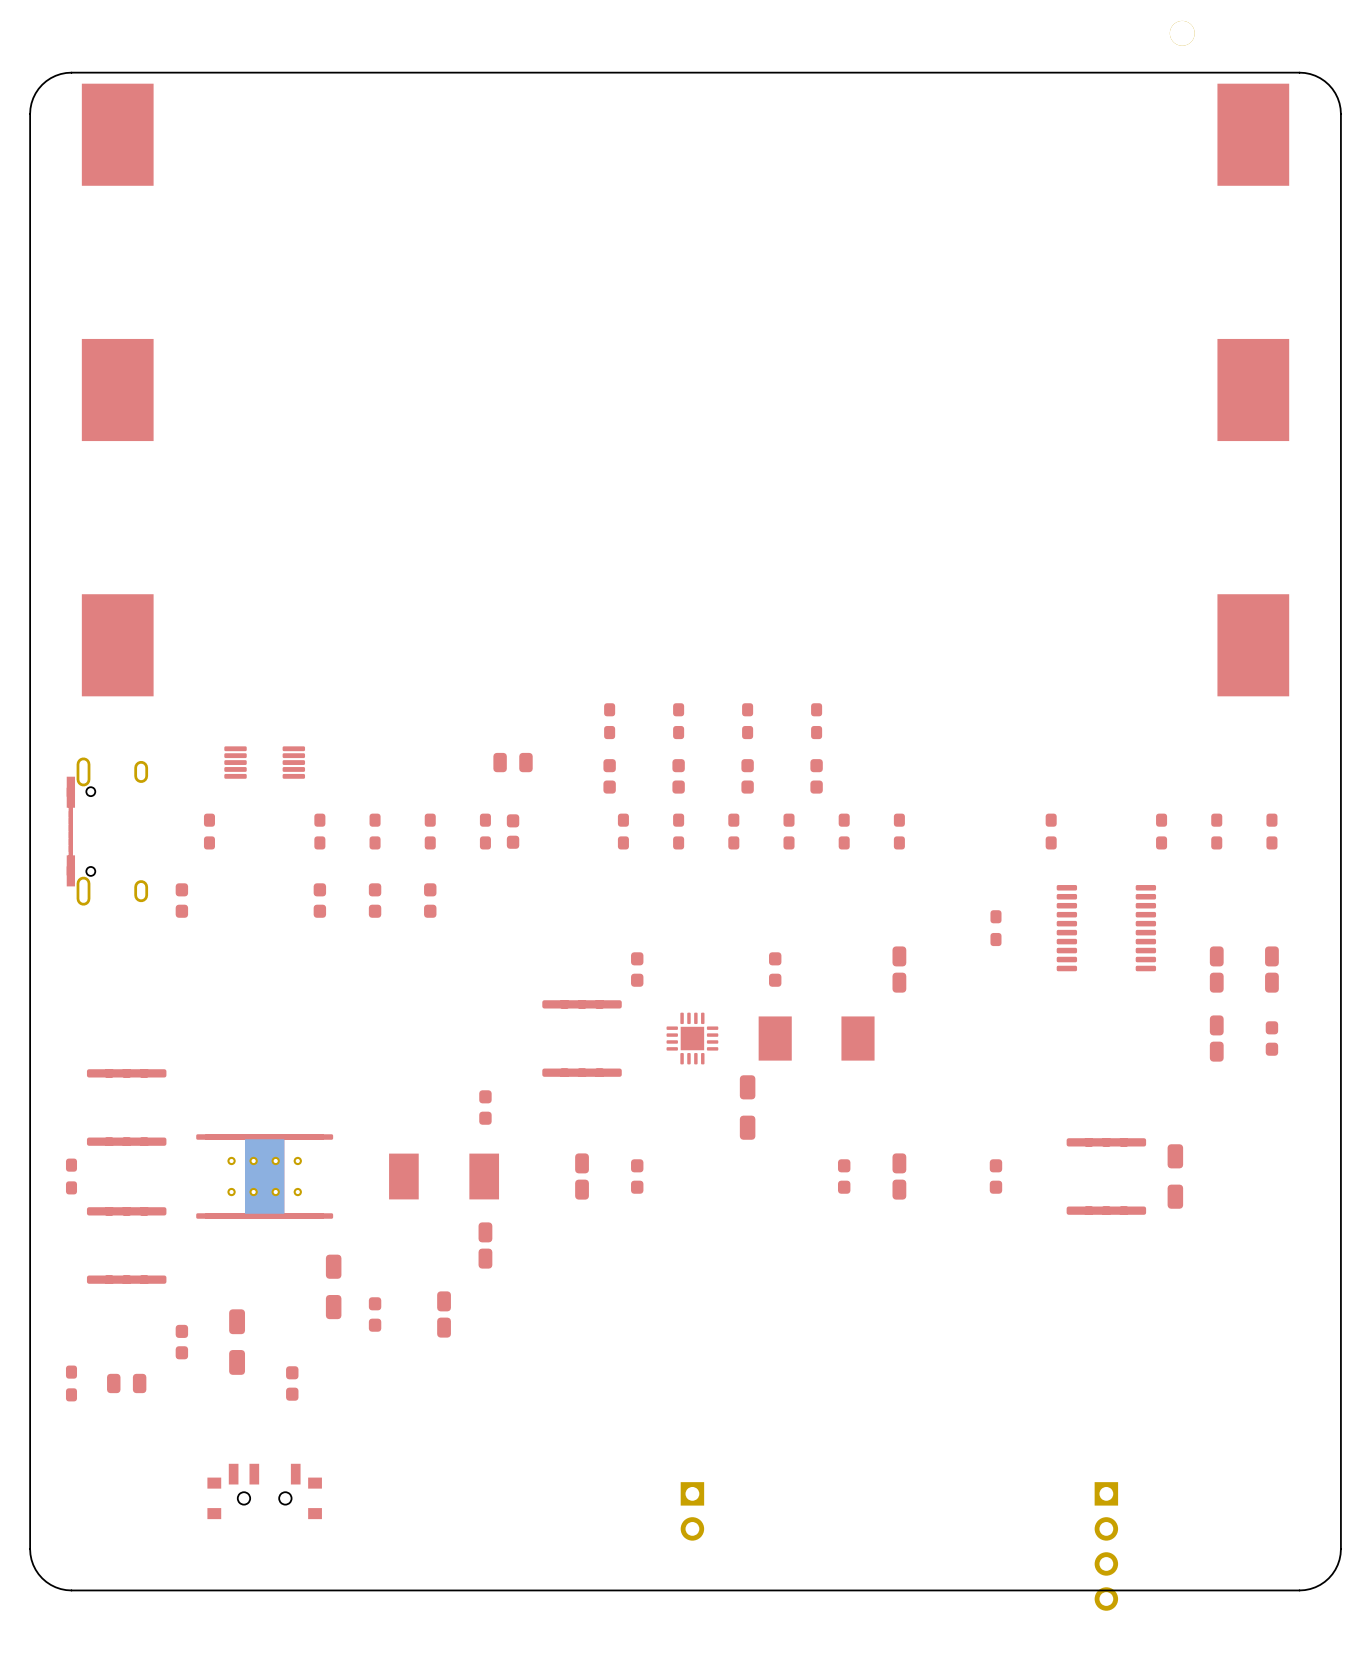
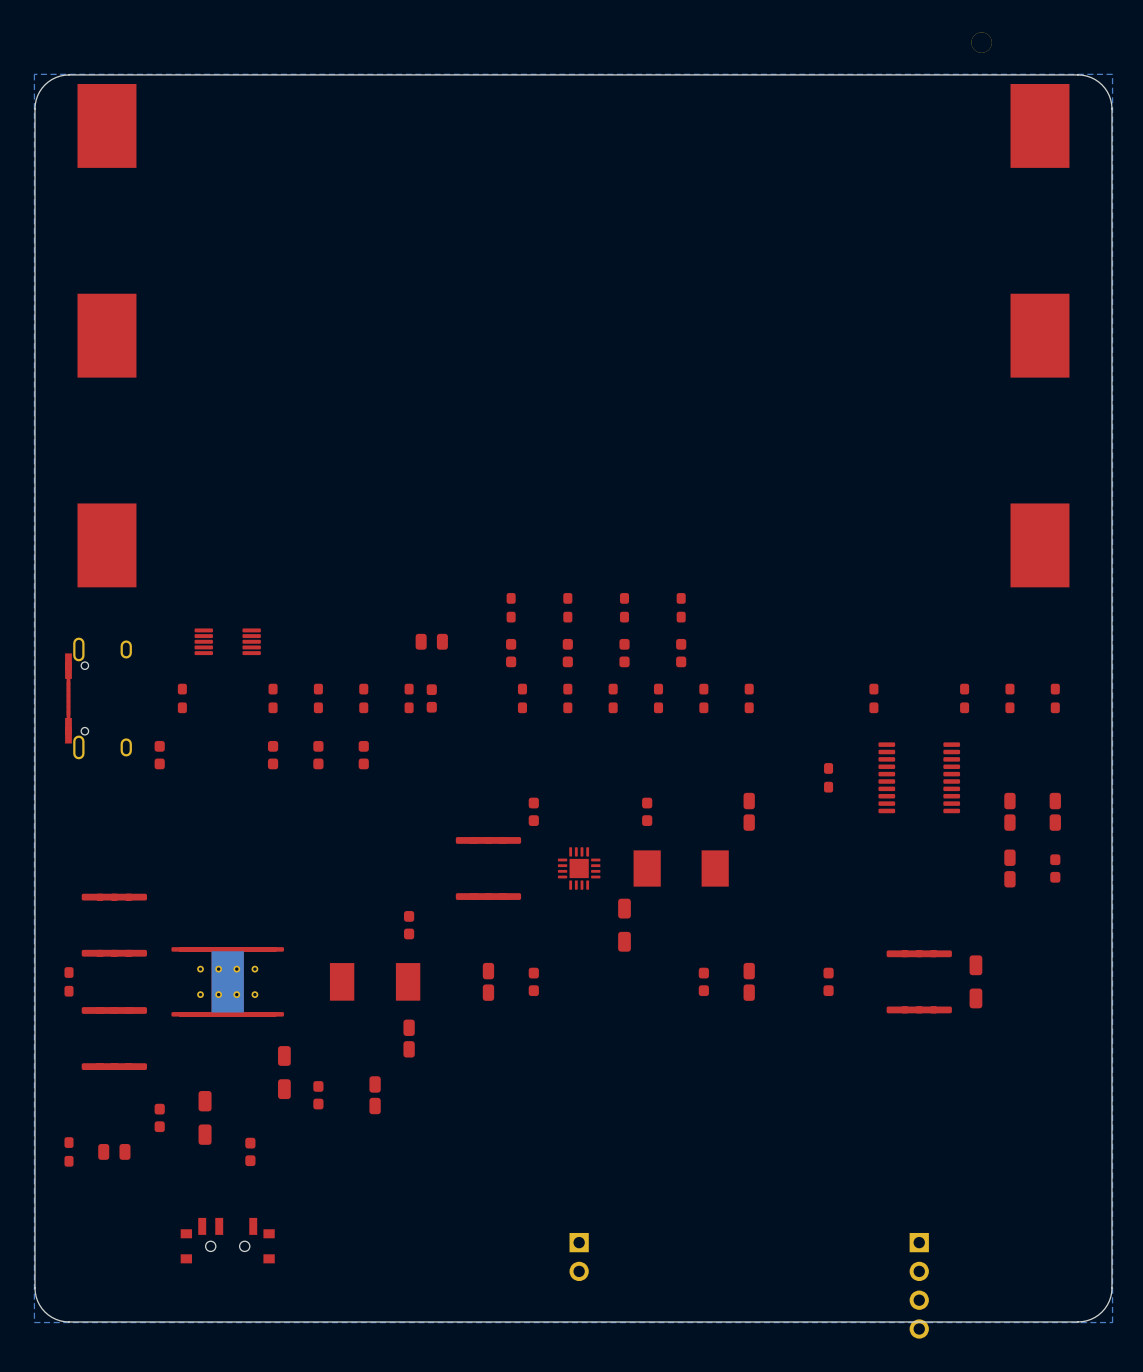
bottom zone outline: none -> (1112, 74) (34, 74) (34, 1322) (1112, 1322) (1112, 74)

